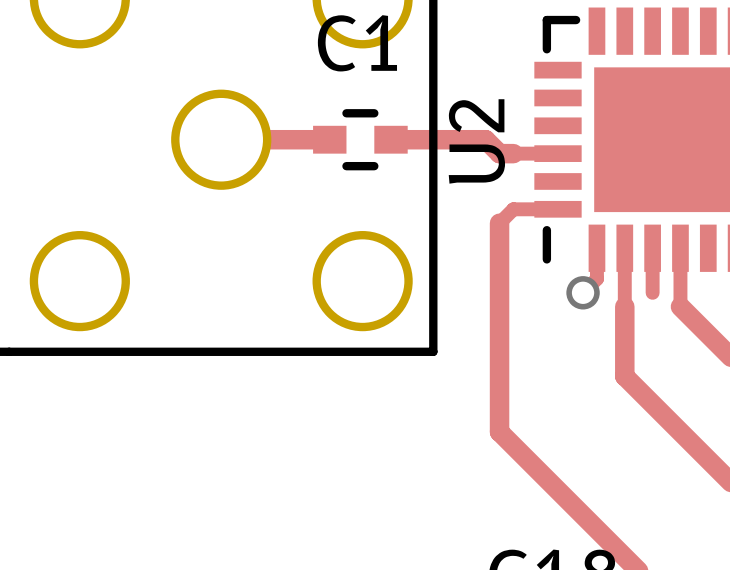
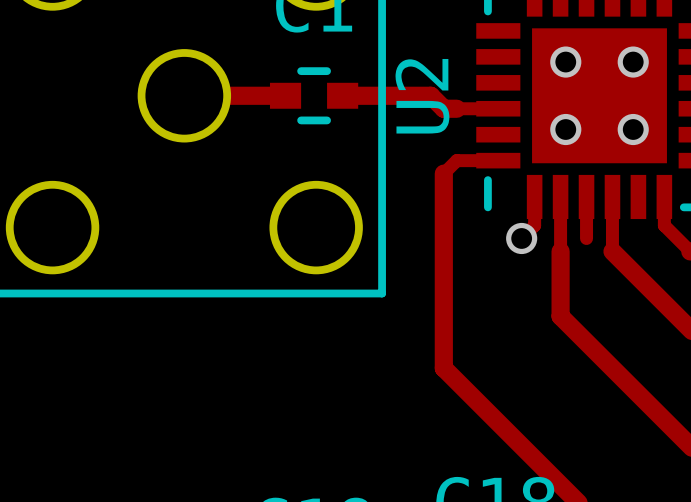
via: none -> (565, 62)
via: none -> (633, 62)
via: none -> (565, 129)
via: none -> (633, 129)

